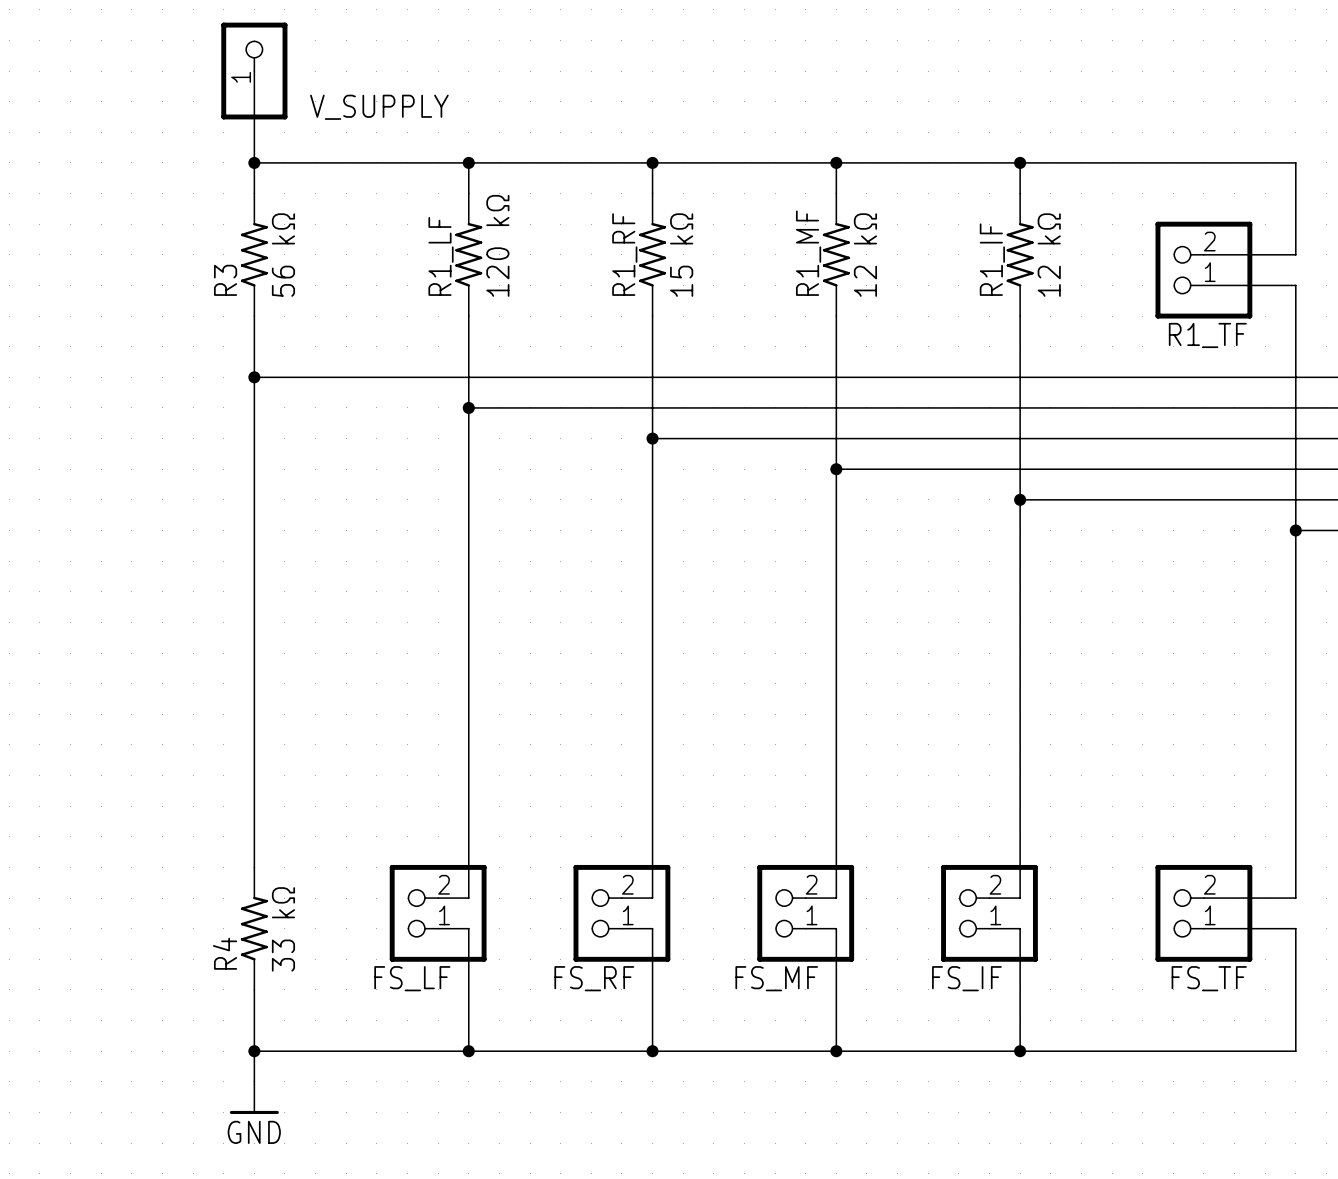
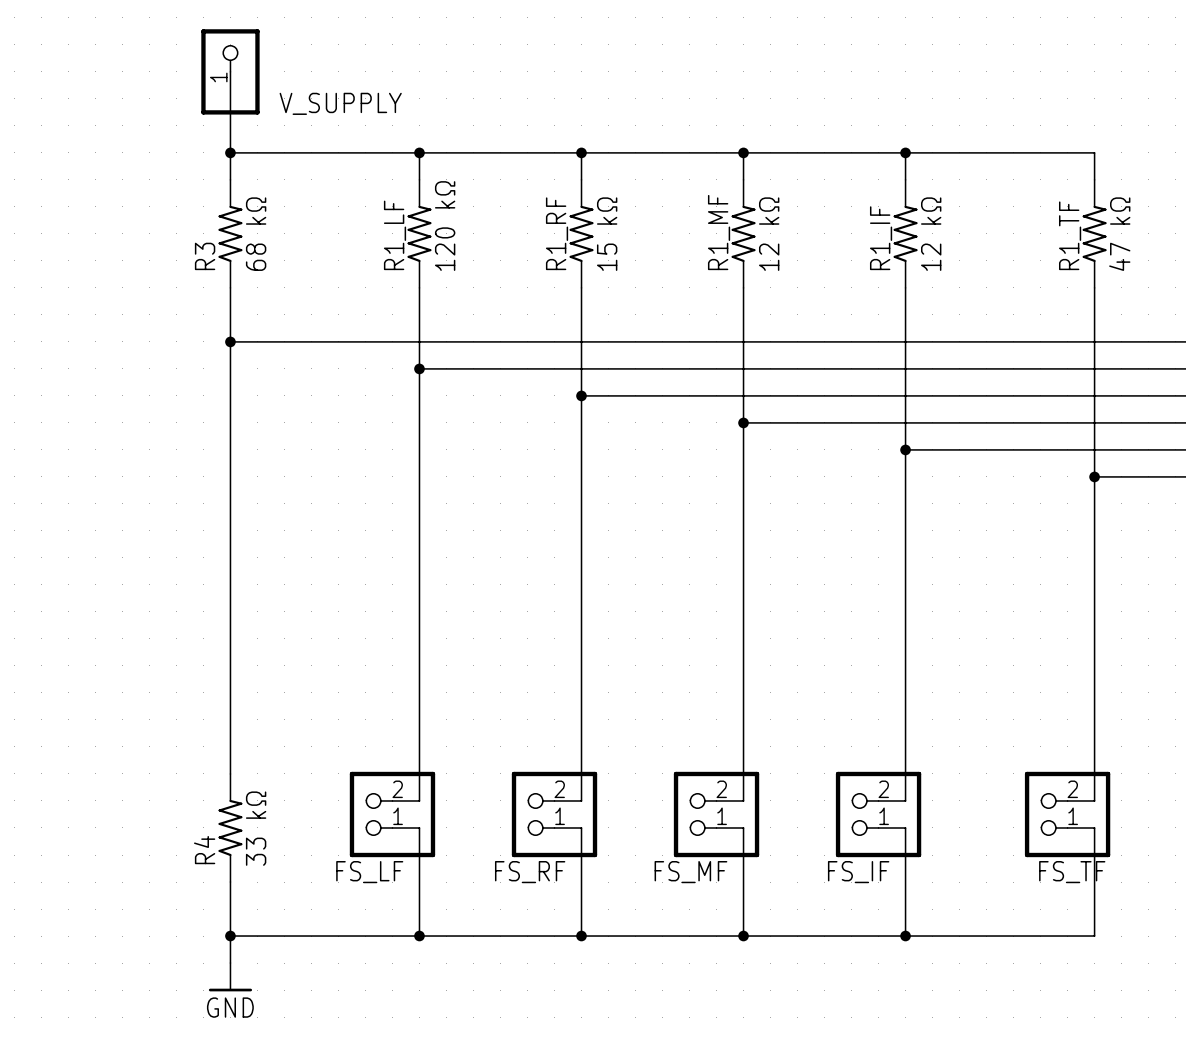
wire: (1234, 162) (1295, 162) (1295, 254) (1203, 254) -> (1094, 152) (1094, 179)
R1_TF symbol: [1155, 221, 1253, 319] -> [1082, 179, 1107, 288]
R3 value: 56 kΩ (283, 255) -> 68 kΩ (256, 234)
R1_TF value: none -> 47 kΩ (1119, 234)
wire: (1203, 285) (1295, 285) (1295, 898) (1234, 898) -> (1094, 287) (1094, 800)
R1_TF name position: R1_TF (1207, 335) -> R1_TF (1070, 235)
wire: none -> (1094, 476) (1148, 476)
junction position: (1295, 530) -> (1094, 476)
wire: (1234, 928) (1295, 928) (1295, 1051) (1234, 1051) -> (1094, 827) (1094, 936)

